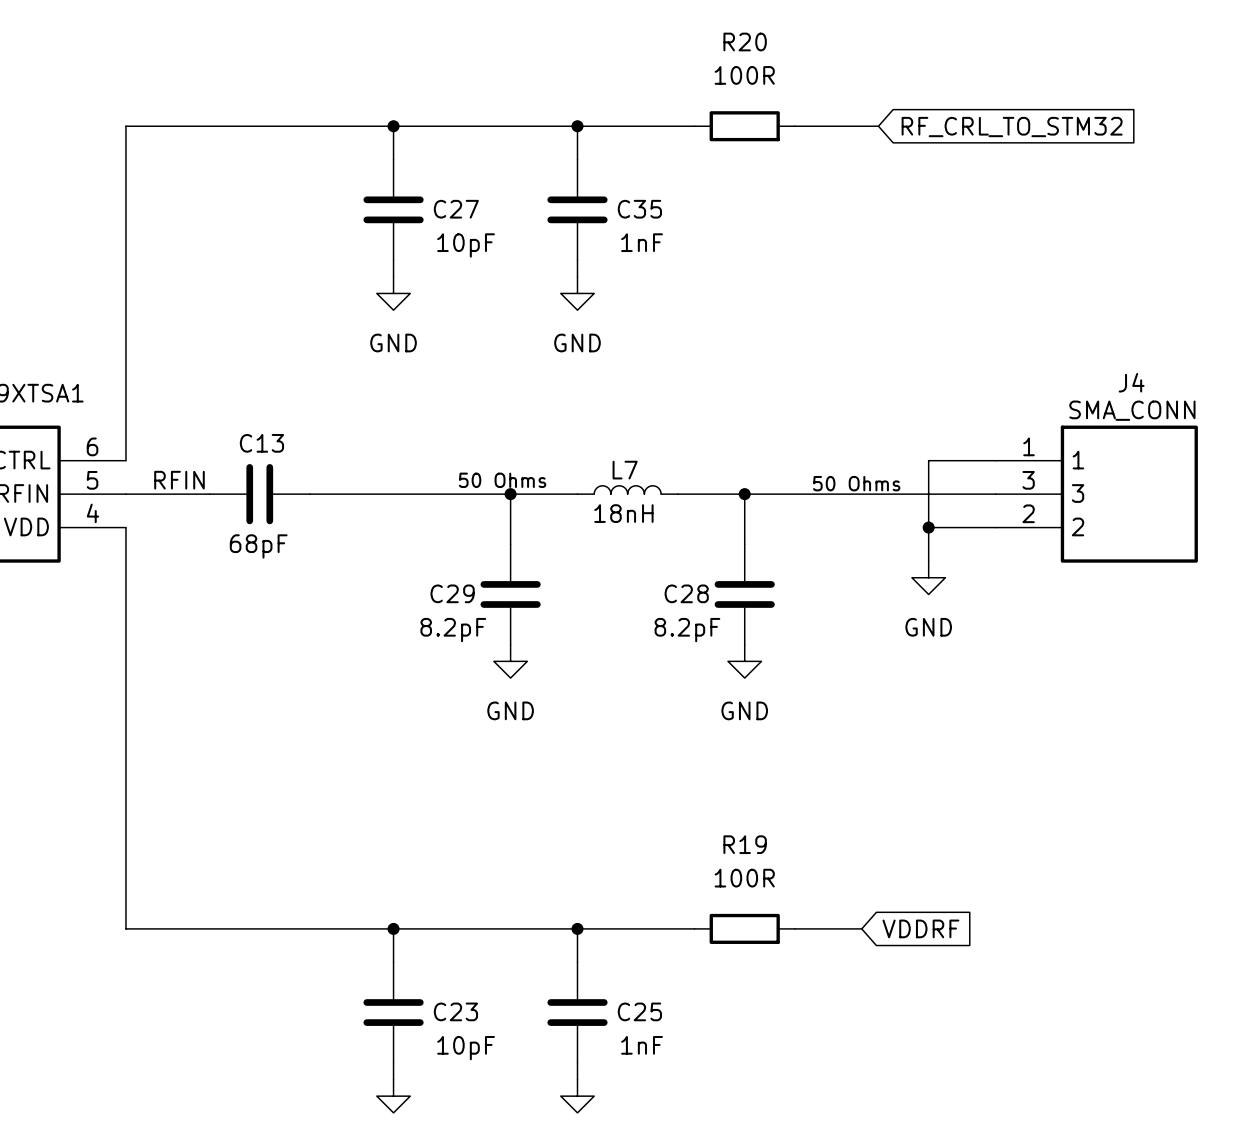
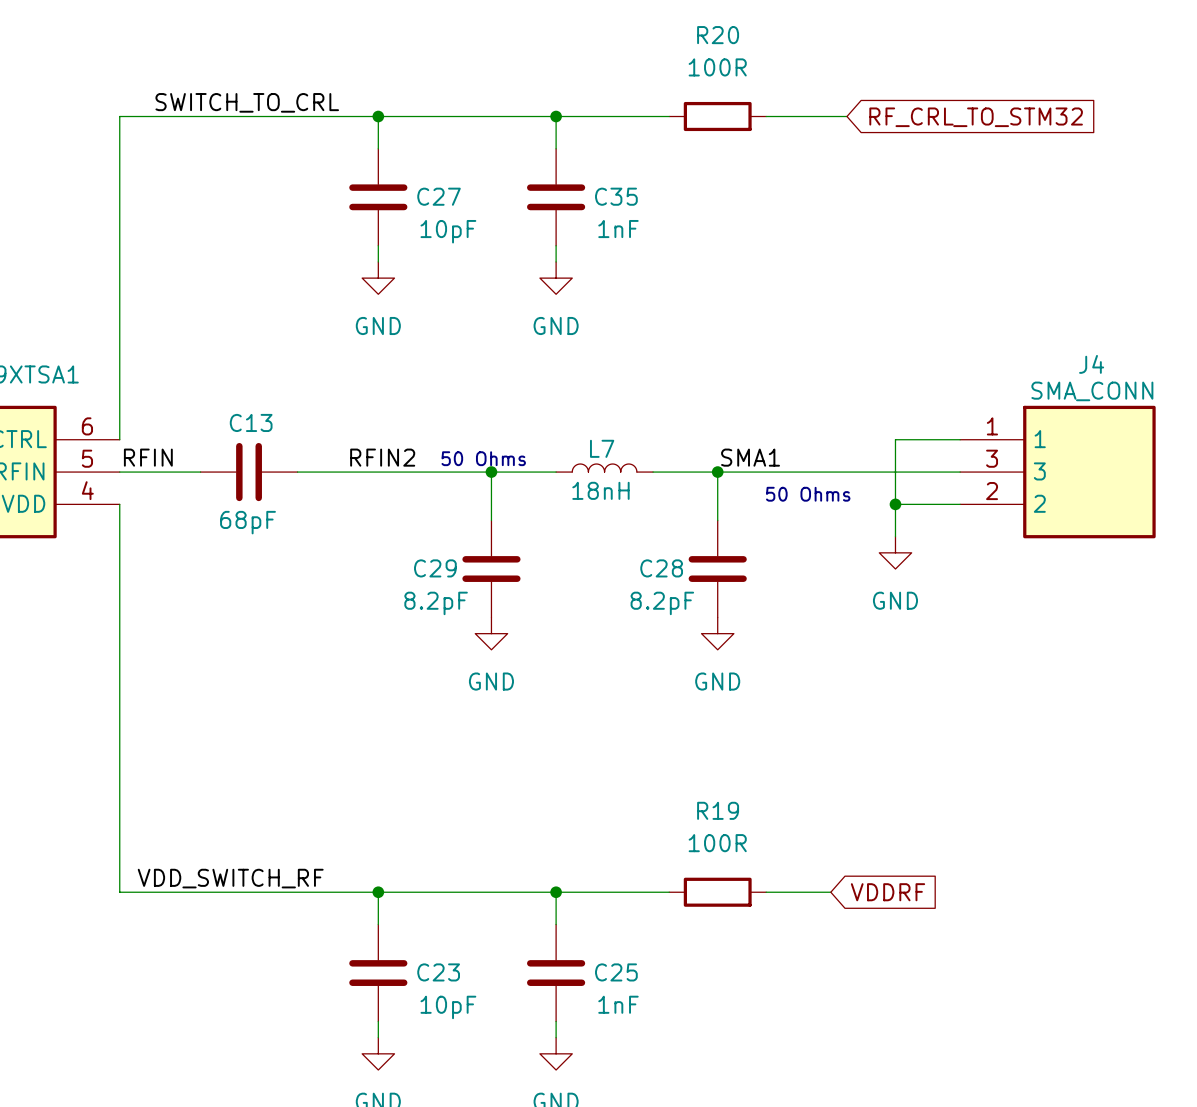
label: none -> SWITCH_TO_CRL (247, 102)
label: none -> RFIN (148, 457)
label: none -> RFIN2 (382, 457)
label: none -> SMA1 (750, 457)
text: RFIN (179, 480) -> none
text position: 50 Ohms (856, 483) -> 50 Ohms (808, 494)
label: none -> VDD_SWITCH_RF (230, 878)

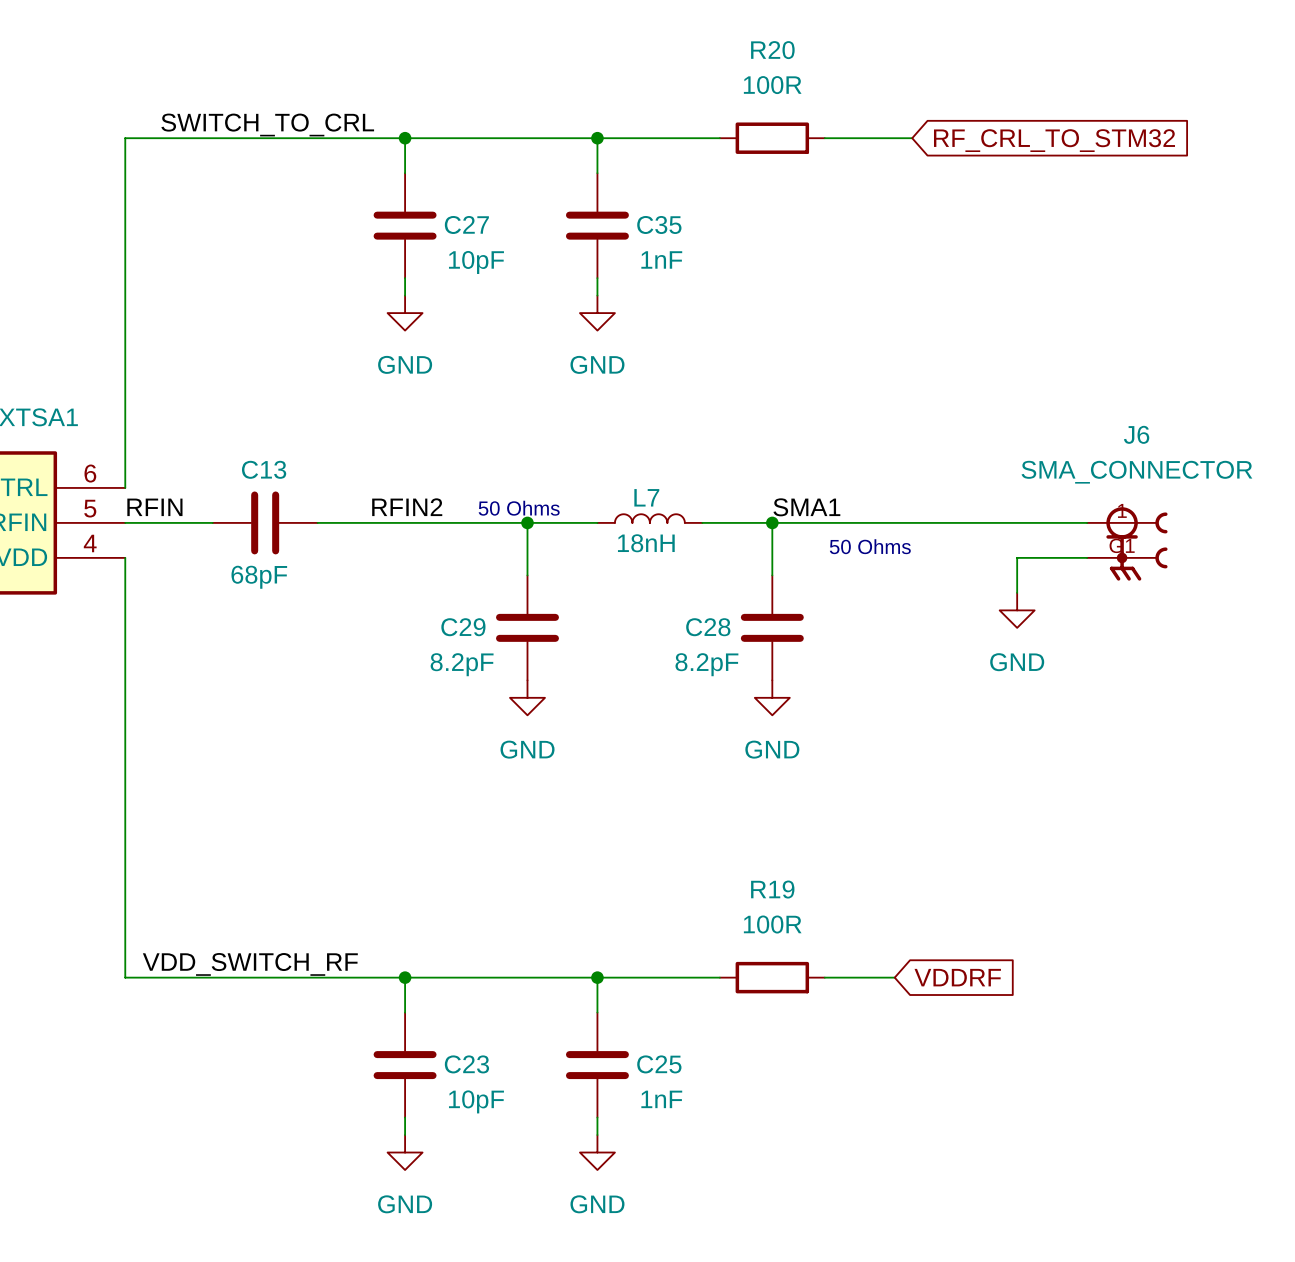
wire: (960, 439) (895, 439) (895, 536) -> none
J4: SMA_CONN (1057, 472) -> none
J6: none -> SMA_CONNECTOR (1127, 543)
wire: (895, 504) (943, 504) -> (1017, 592) (1017, 557)
junction: (895, 504) -> none
power symbol position: GND (895, 552) -> GND (1017, 610)

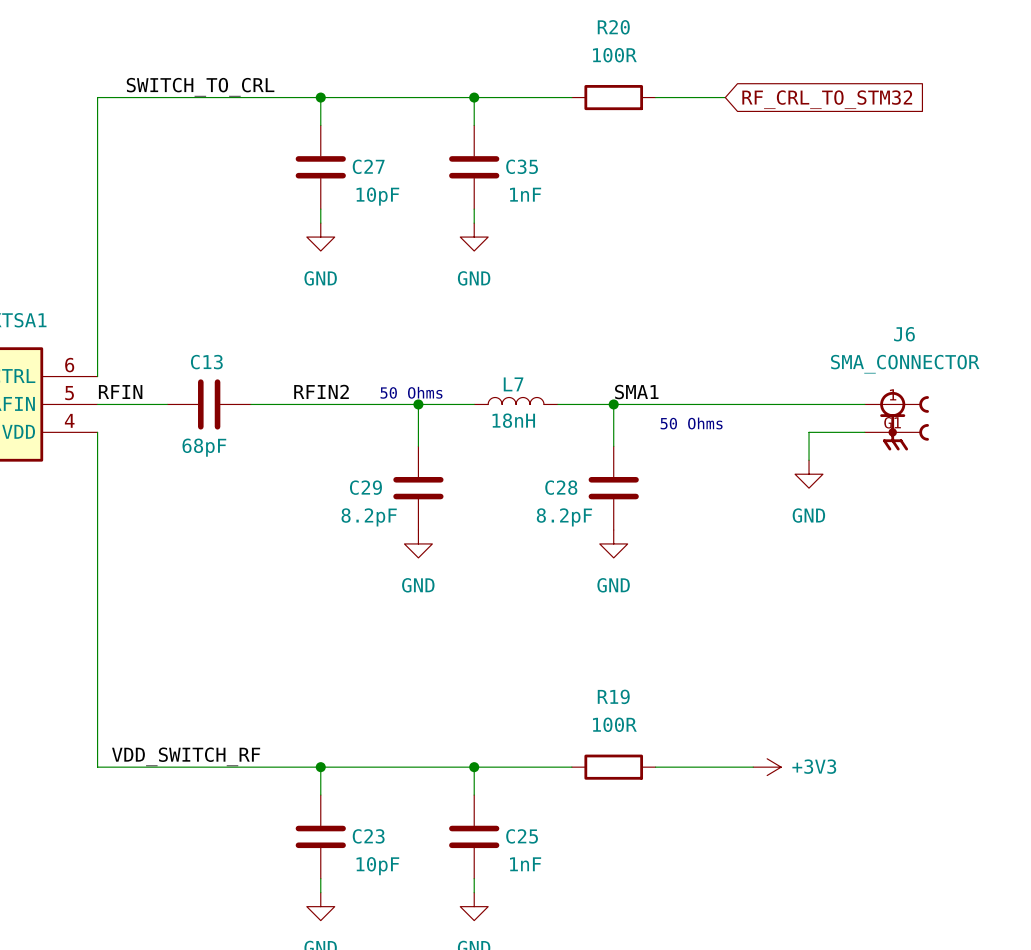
wire: none -> (711, 767) (753, 767)
global label: VDDRF (957, 977) -> none
power symbol: none -> +3V3 (767, 767)

